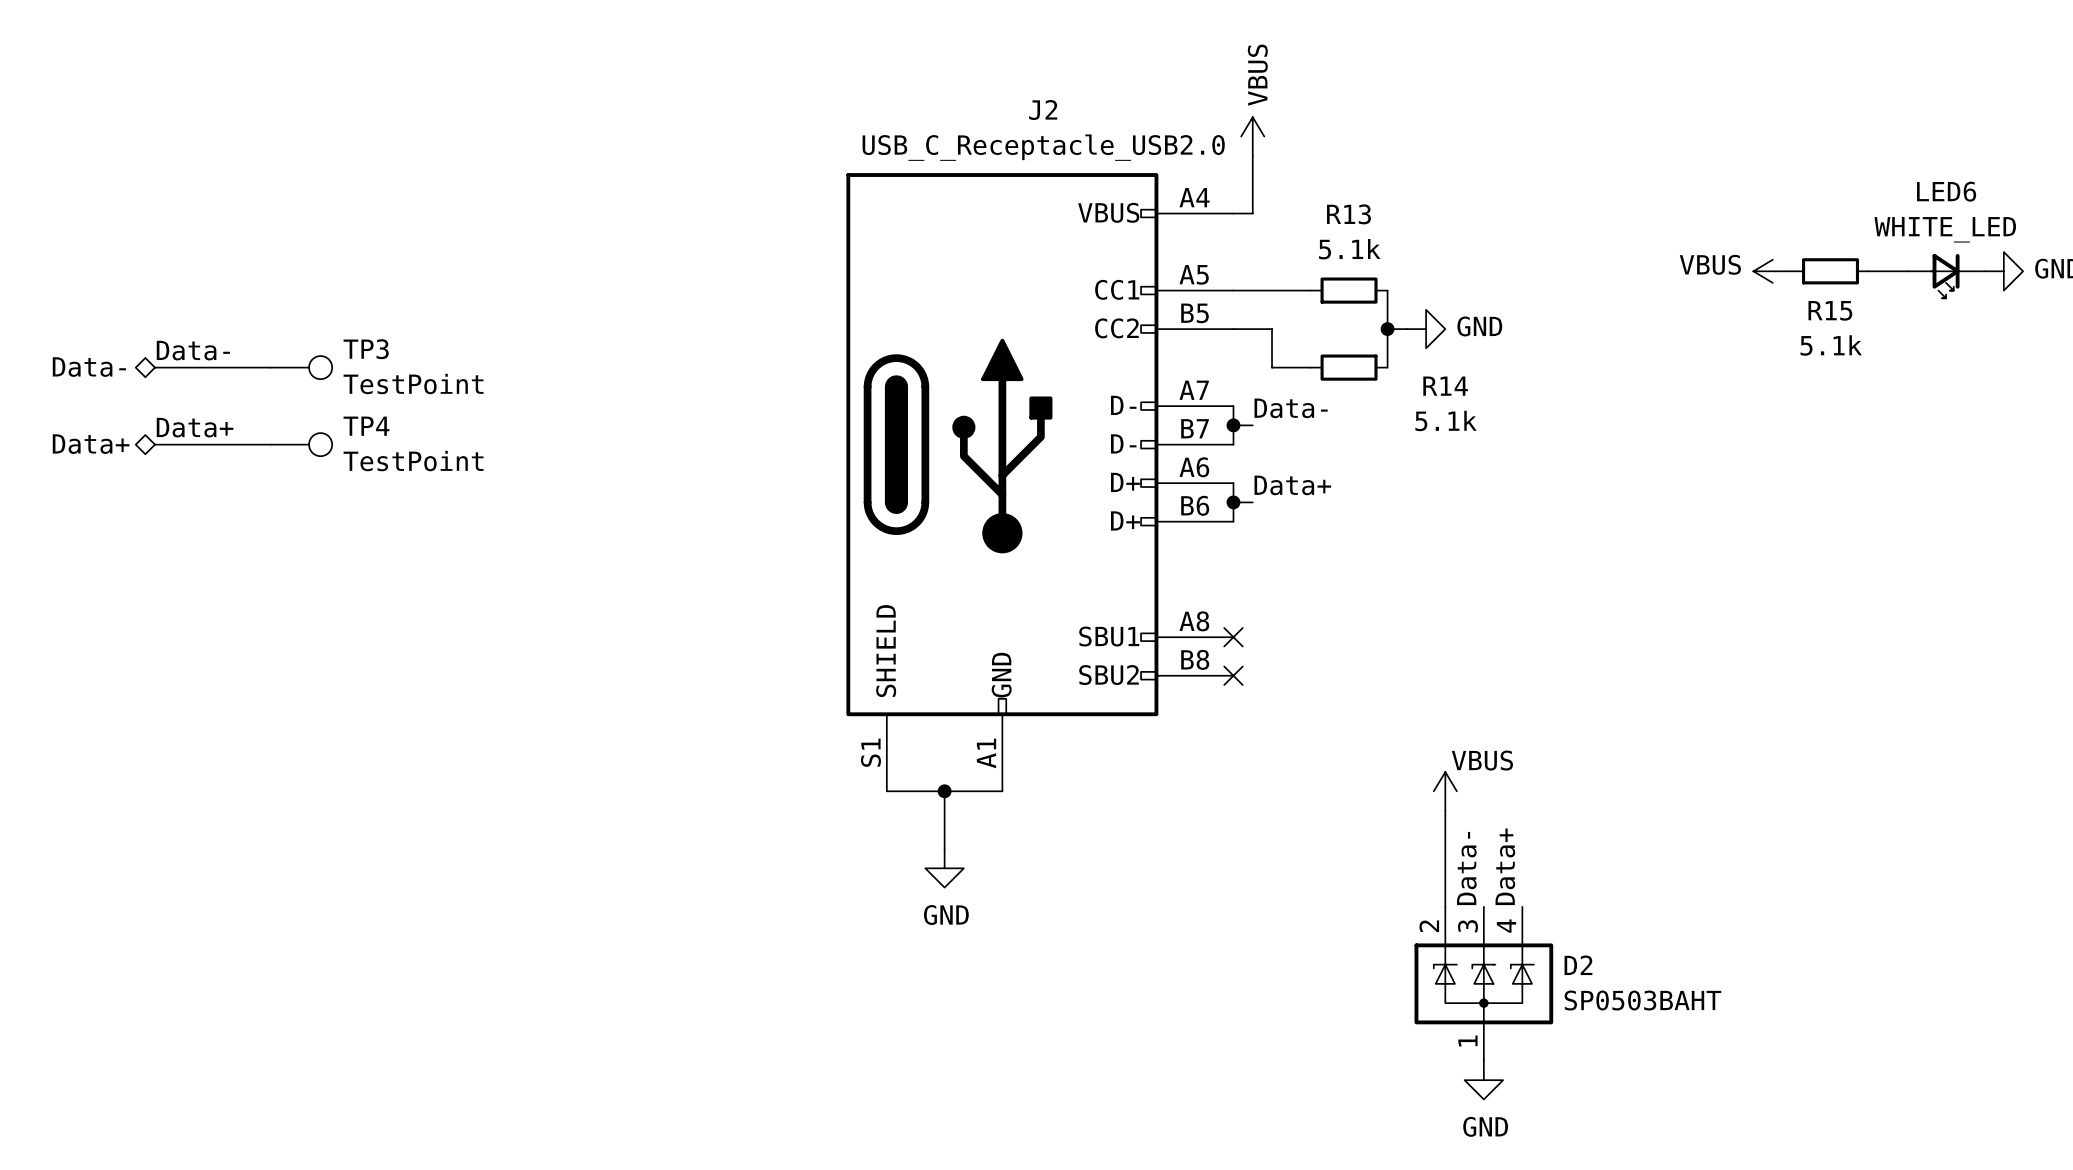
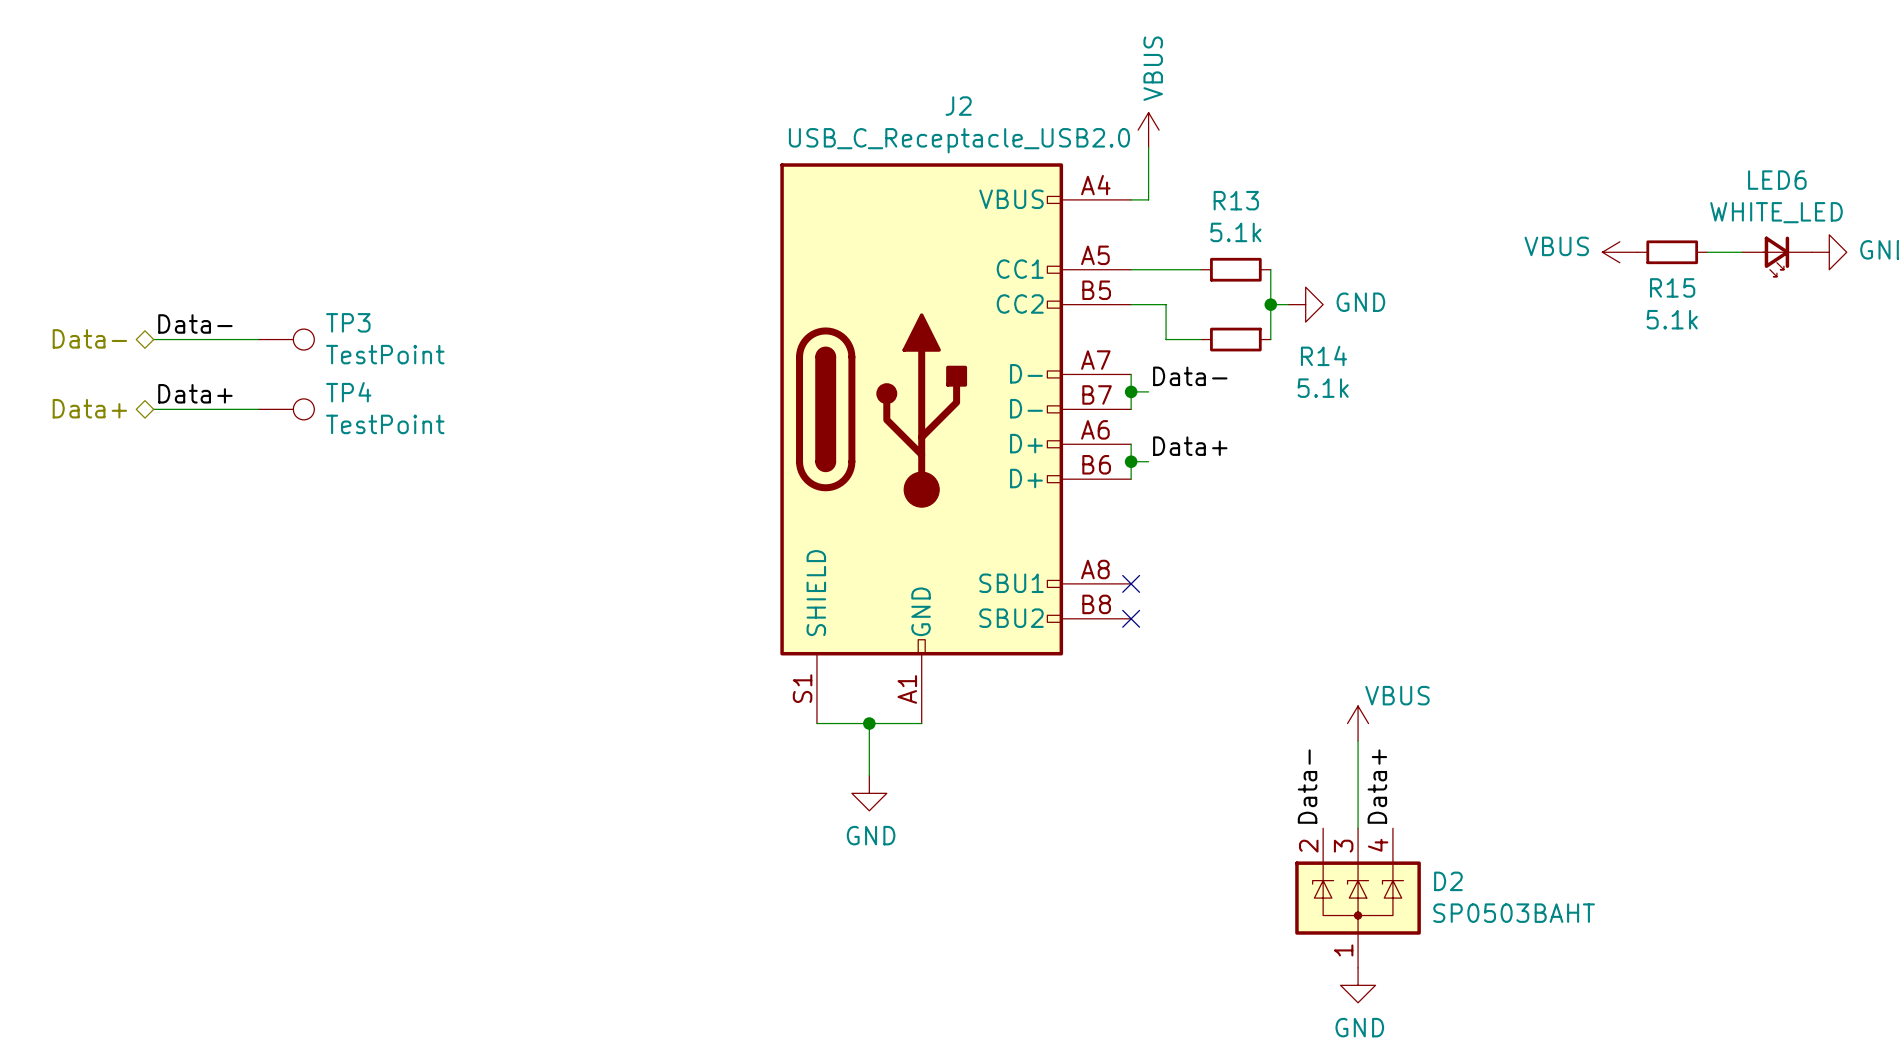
power symbol position: VBUS (1445, 791) -> VBUS (1358, 723)
wire: (1445, 810) (1445, 906) -> (1358, 740) (1358, 828)
label position: Data- (1466, 868) -> Data- (1307, 786)

